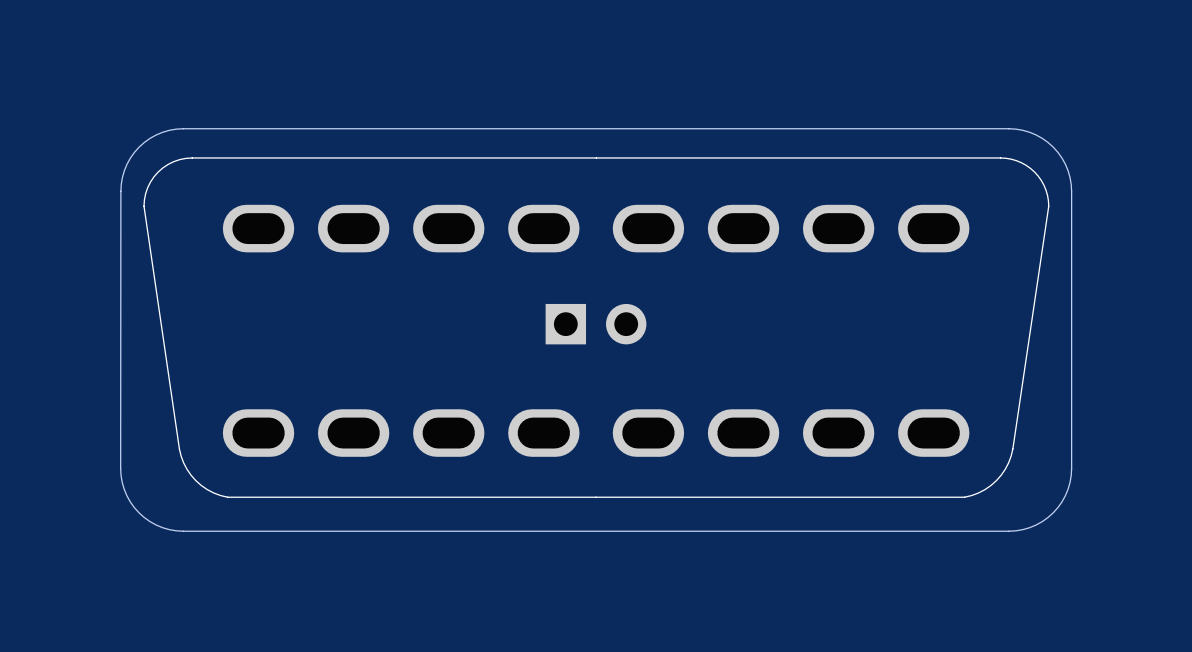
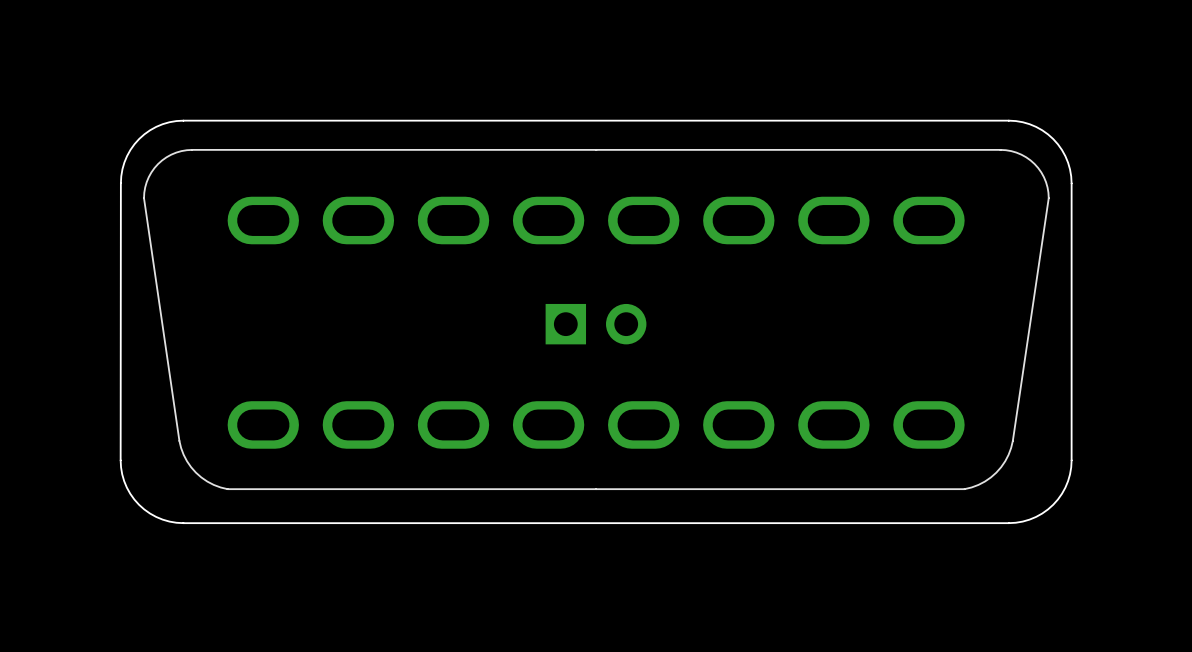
part footprint: [120, 128, 1073, 532] -> [120, 120, 1073, 524]

